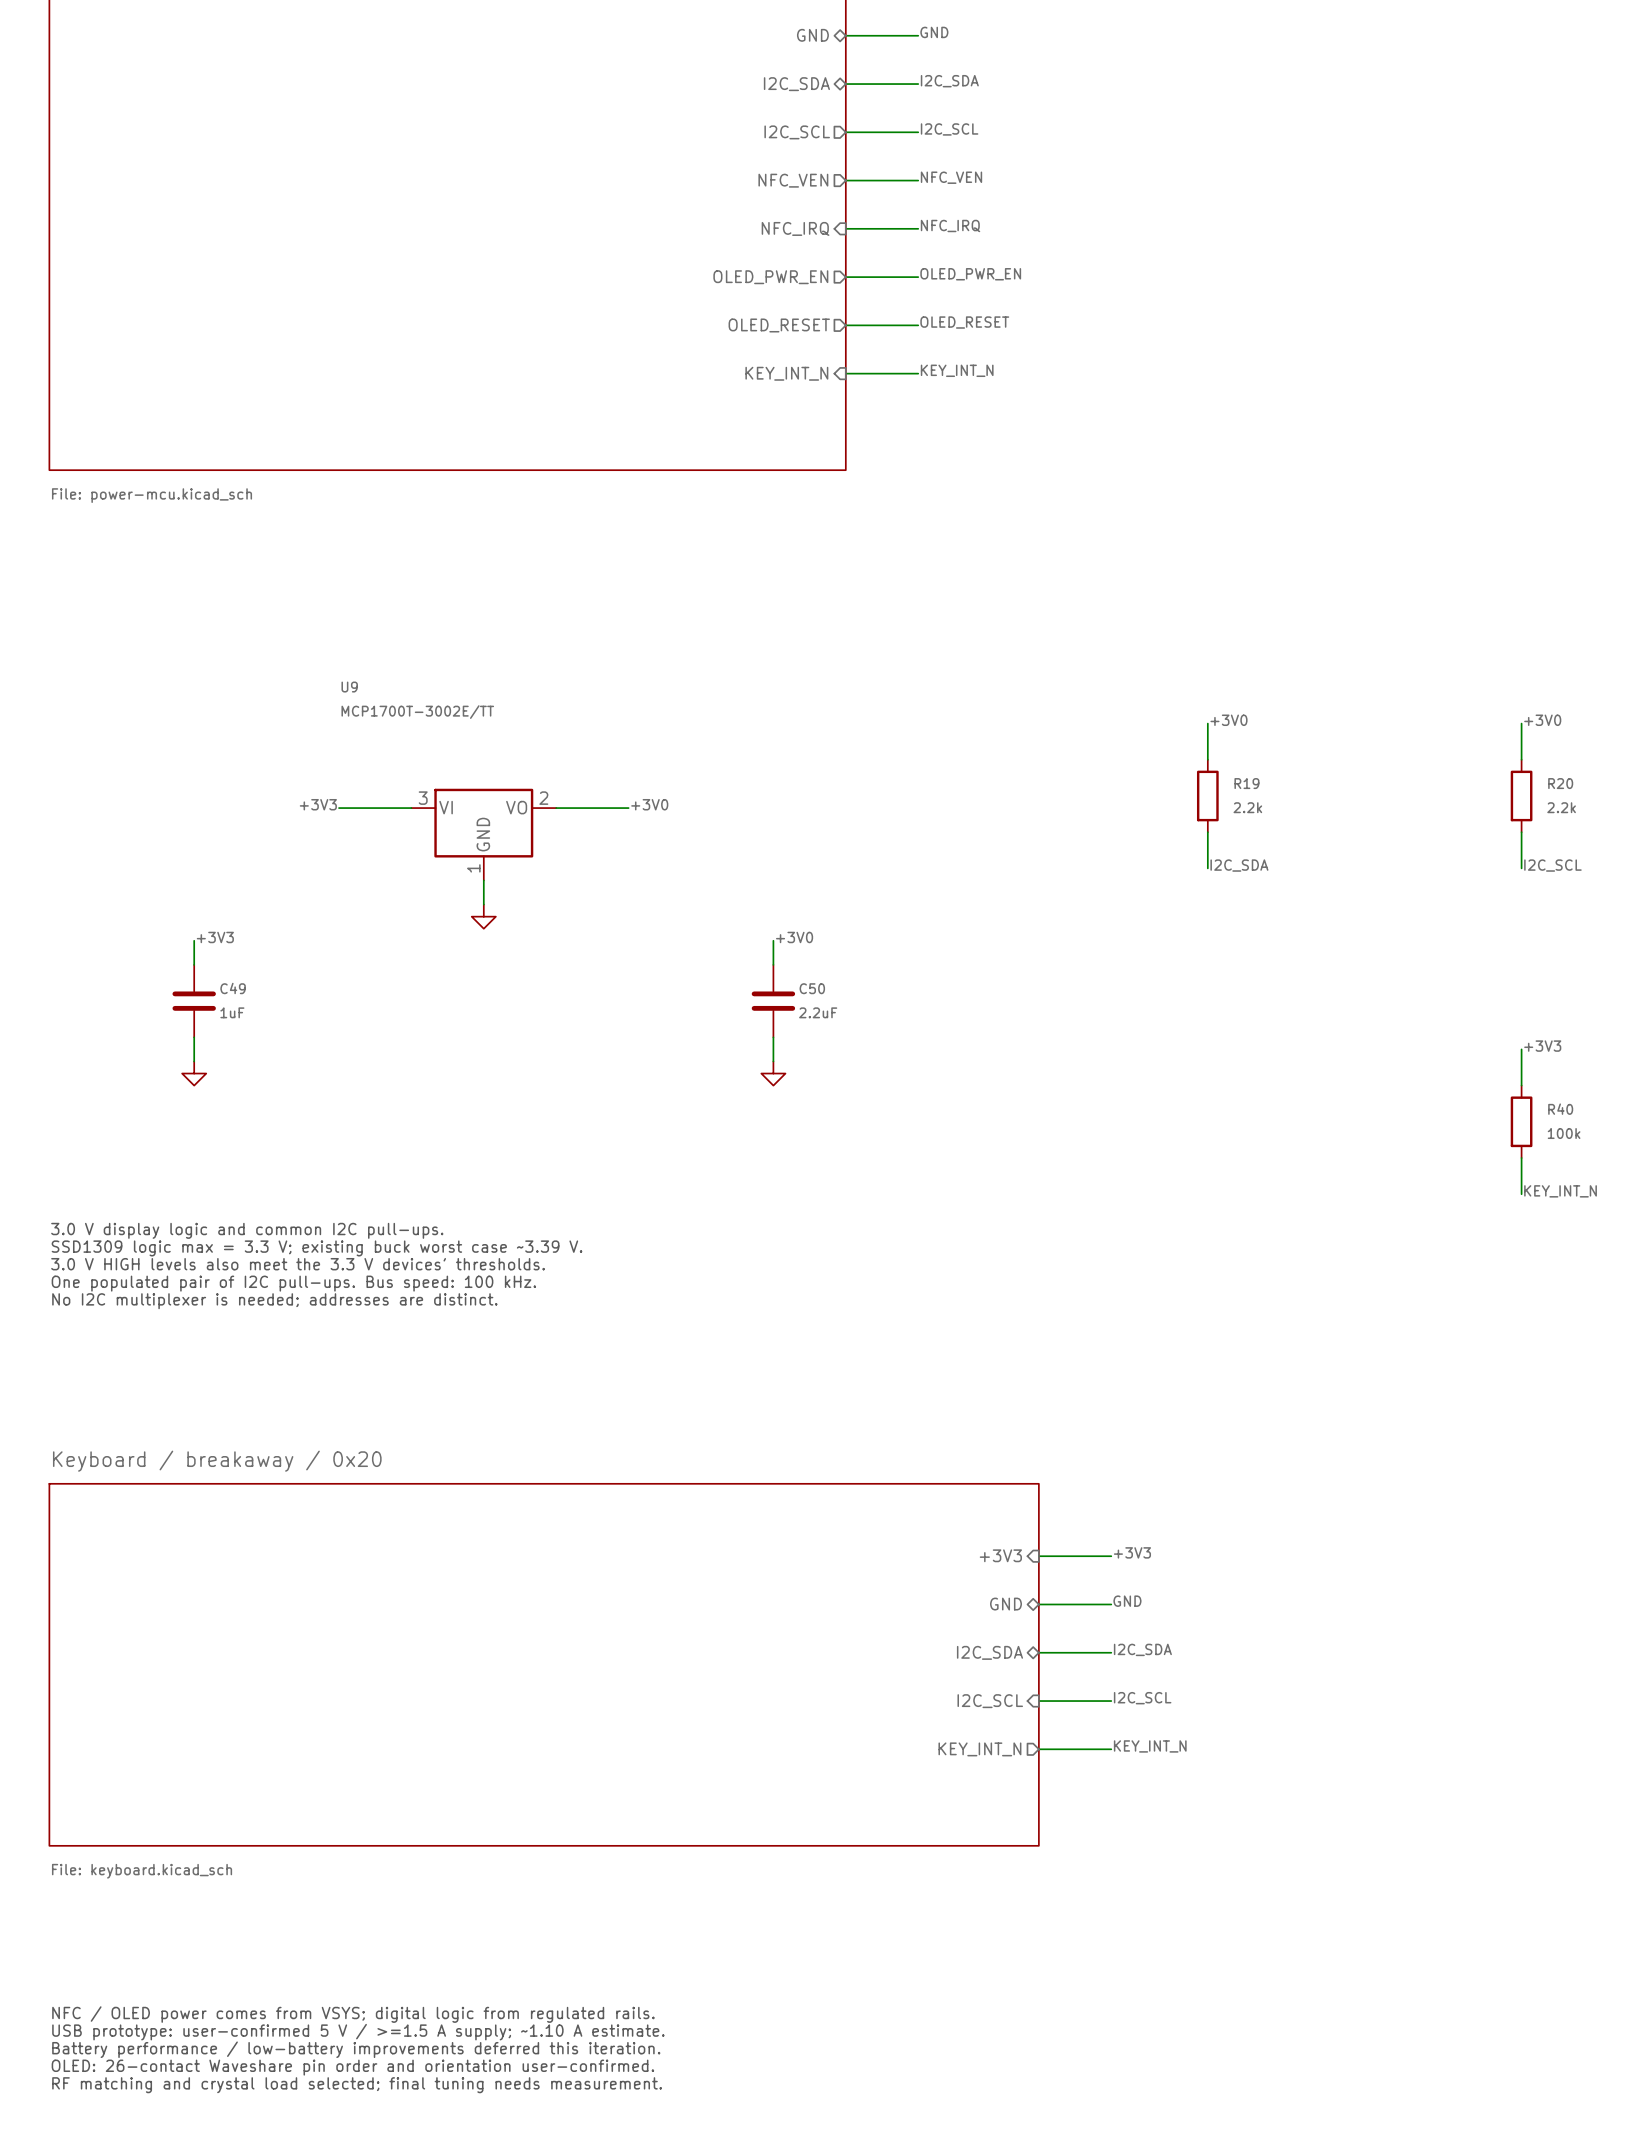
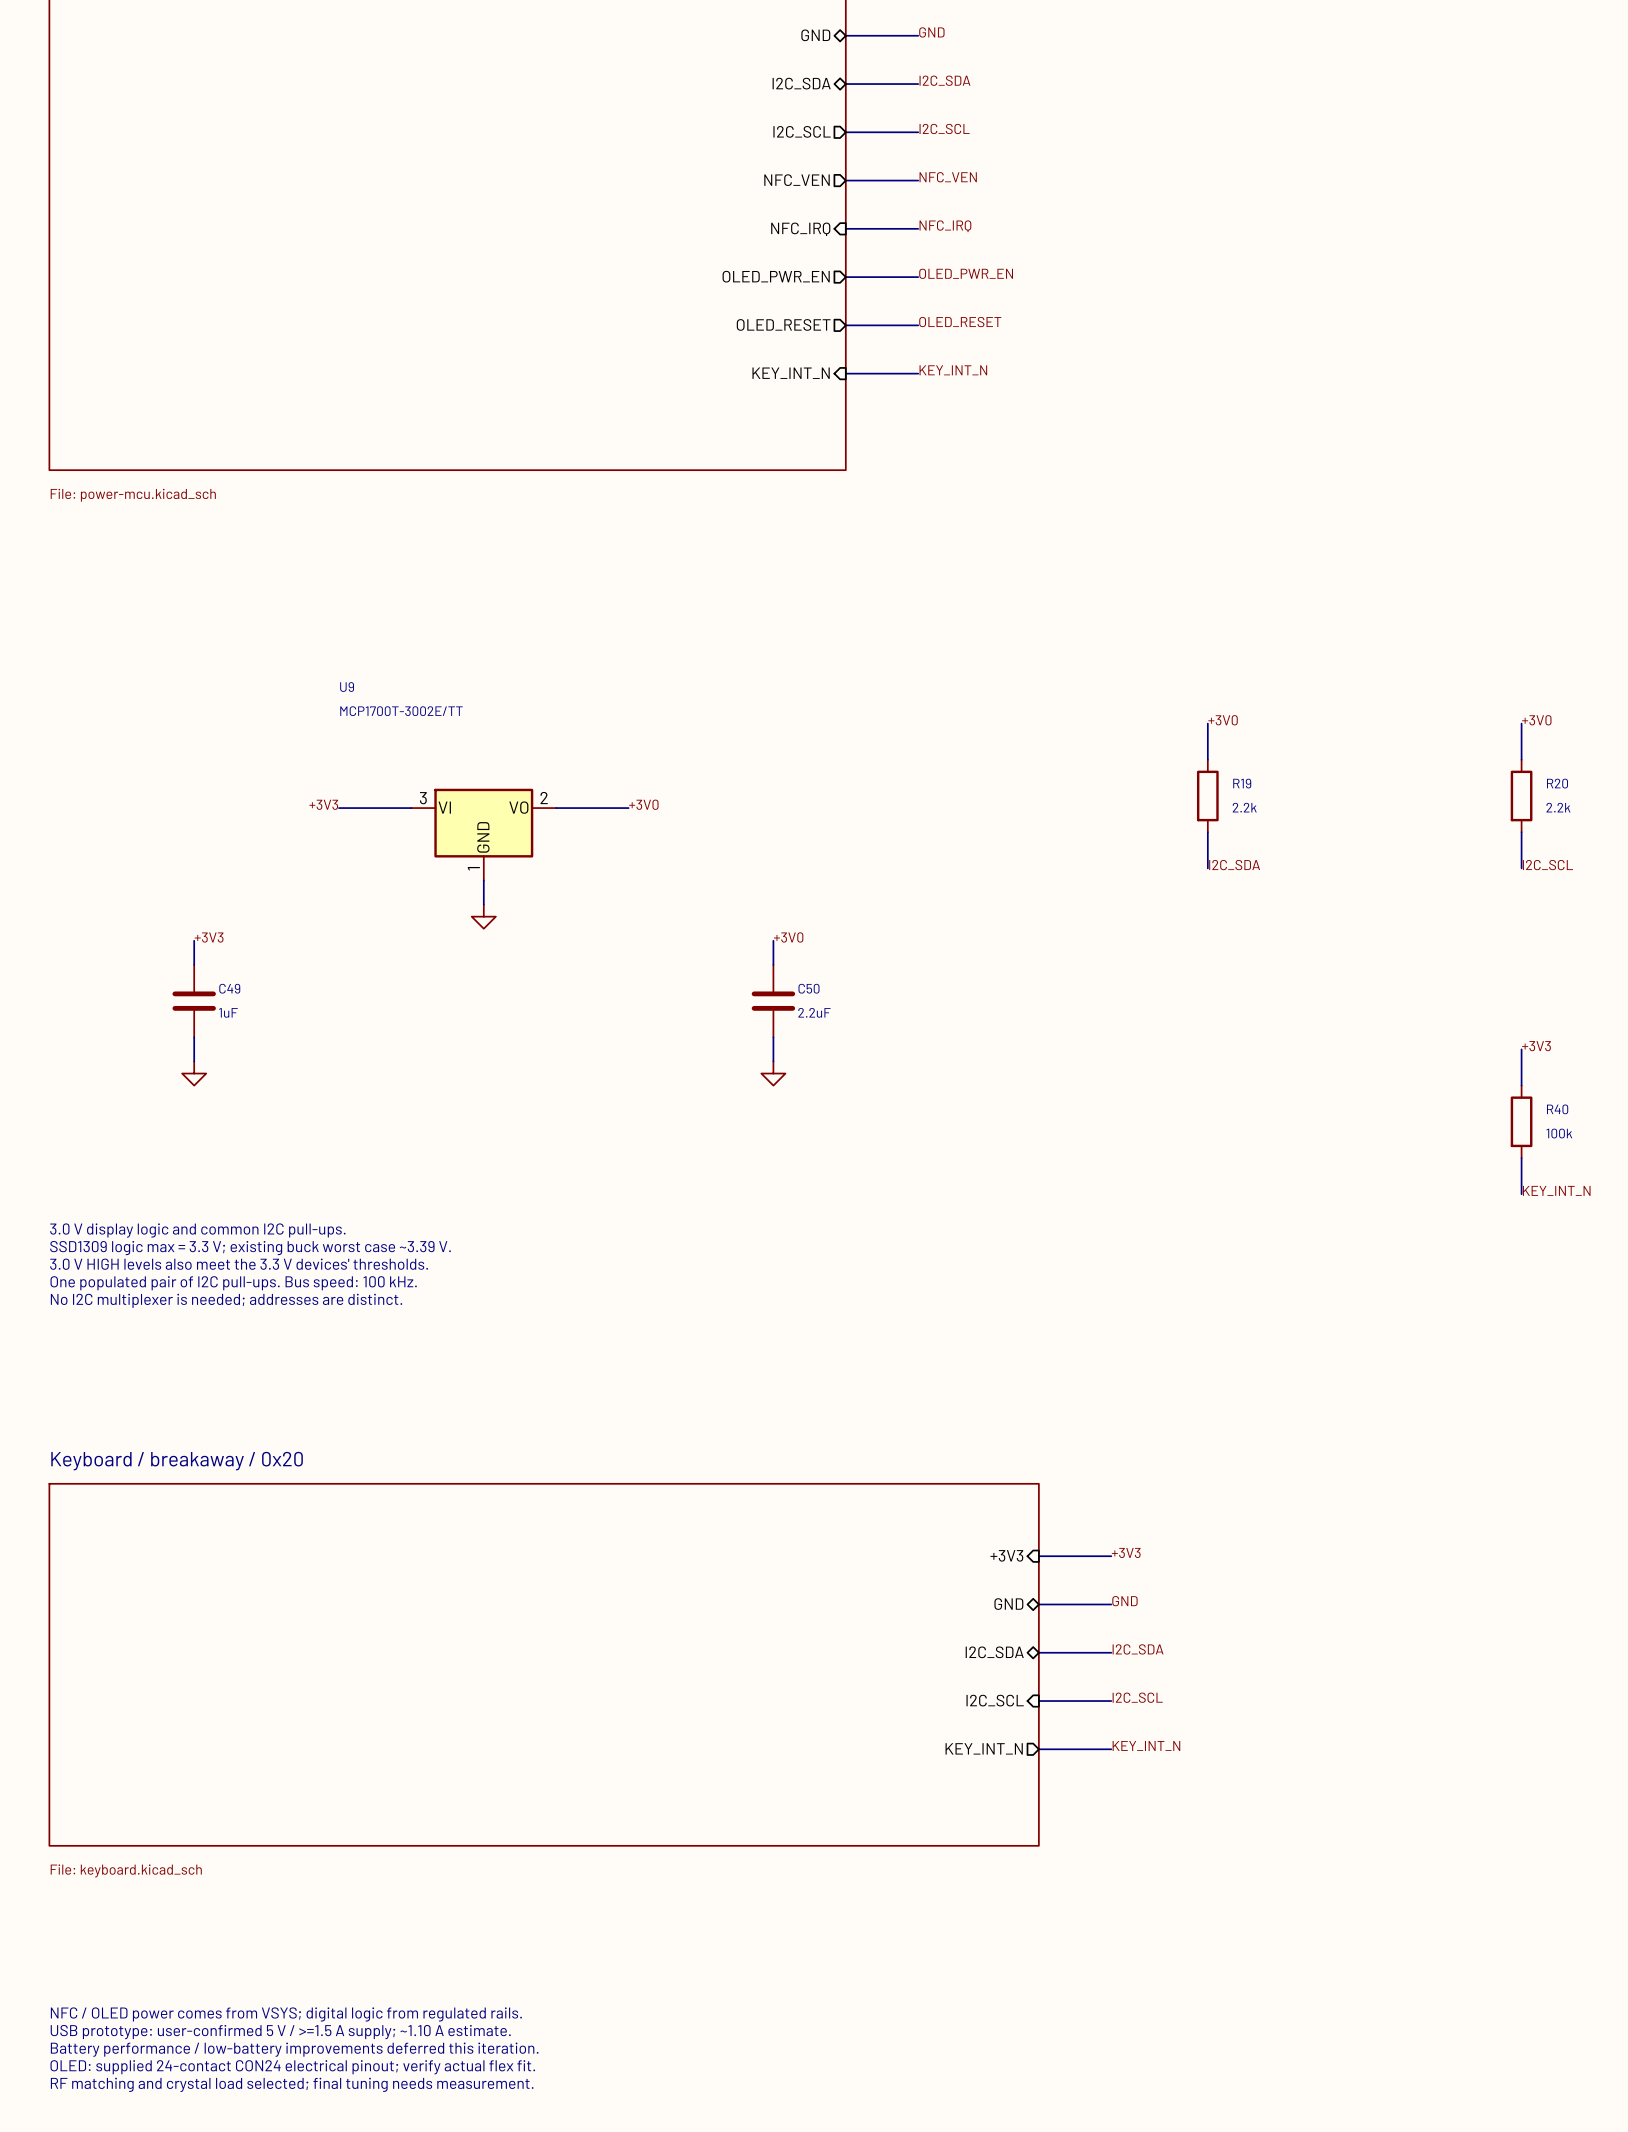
text: OLED: 26-contact Waveshare pin order and orientation user-confirmed. (352, 2067) -> OLED: supplied 24-contact CON24 electrical pinout; verify actual flex fit. (292, 2067)

